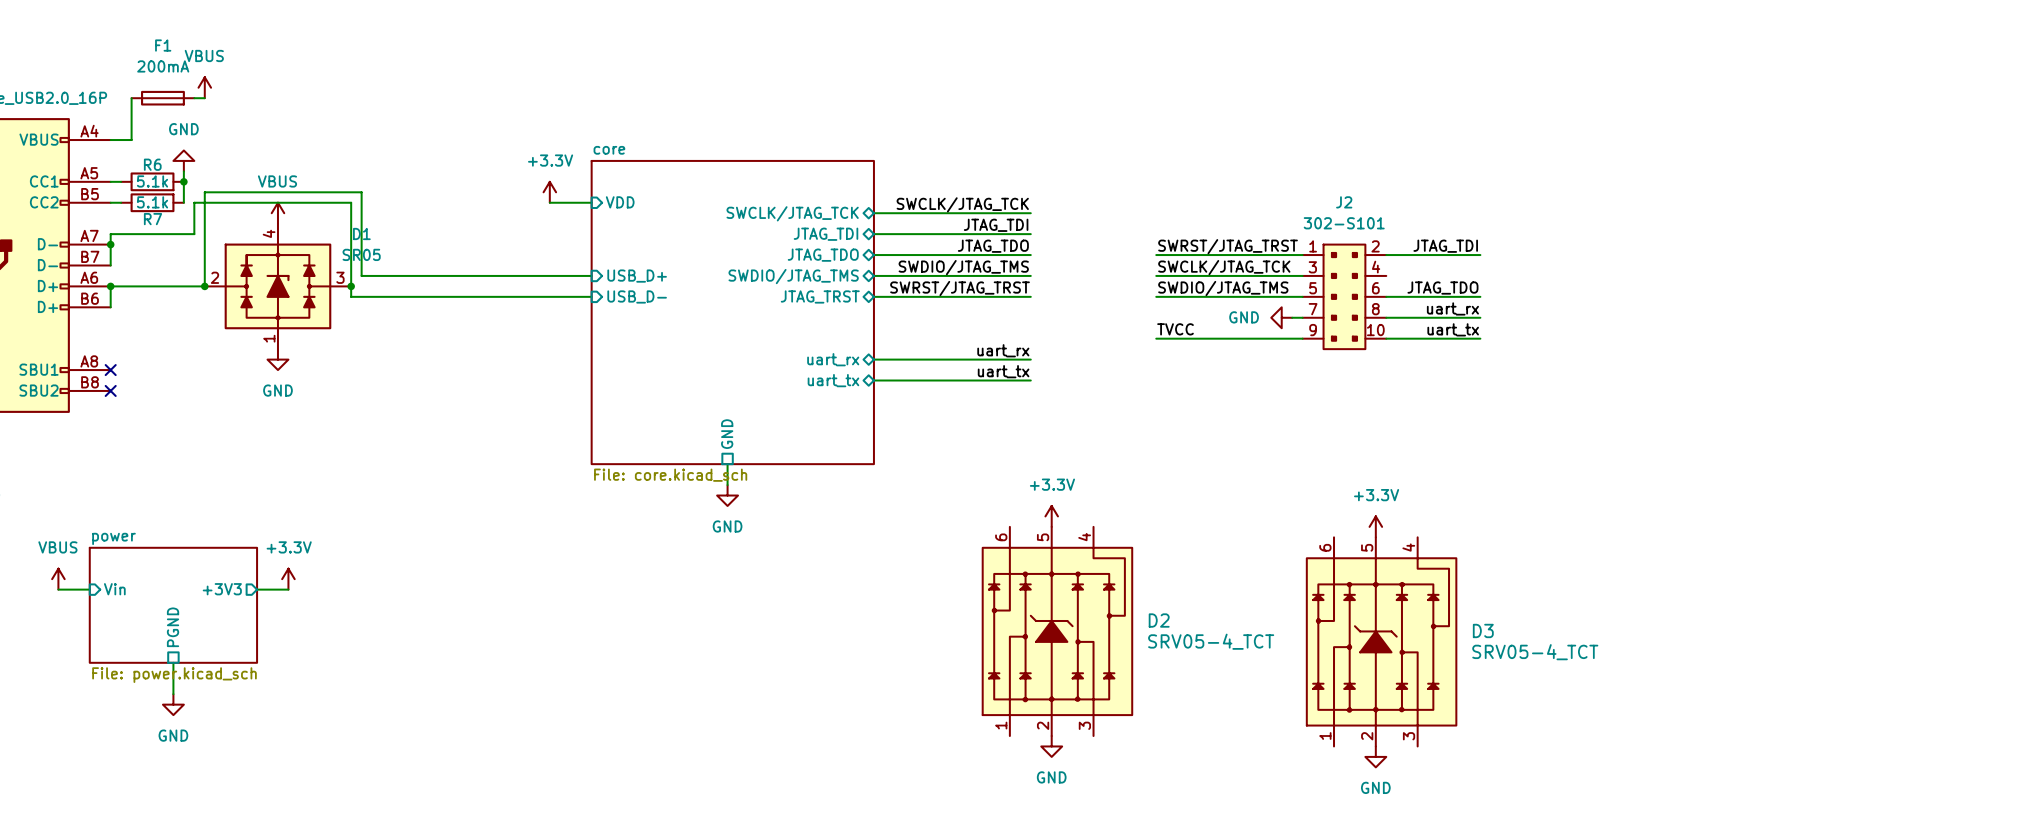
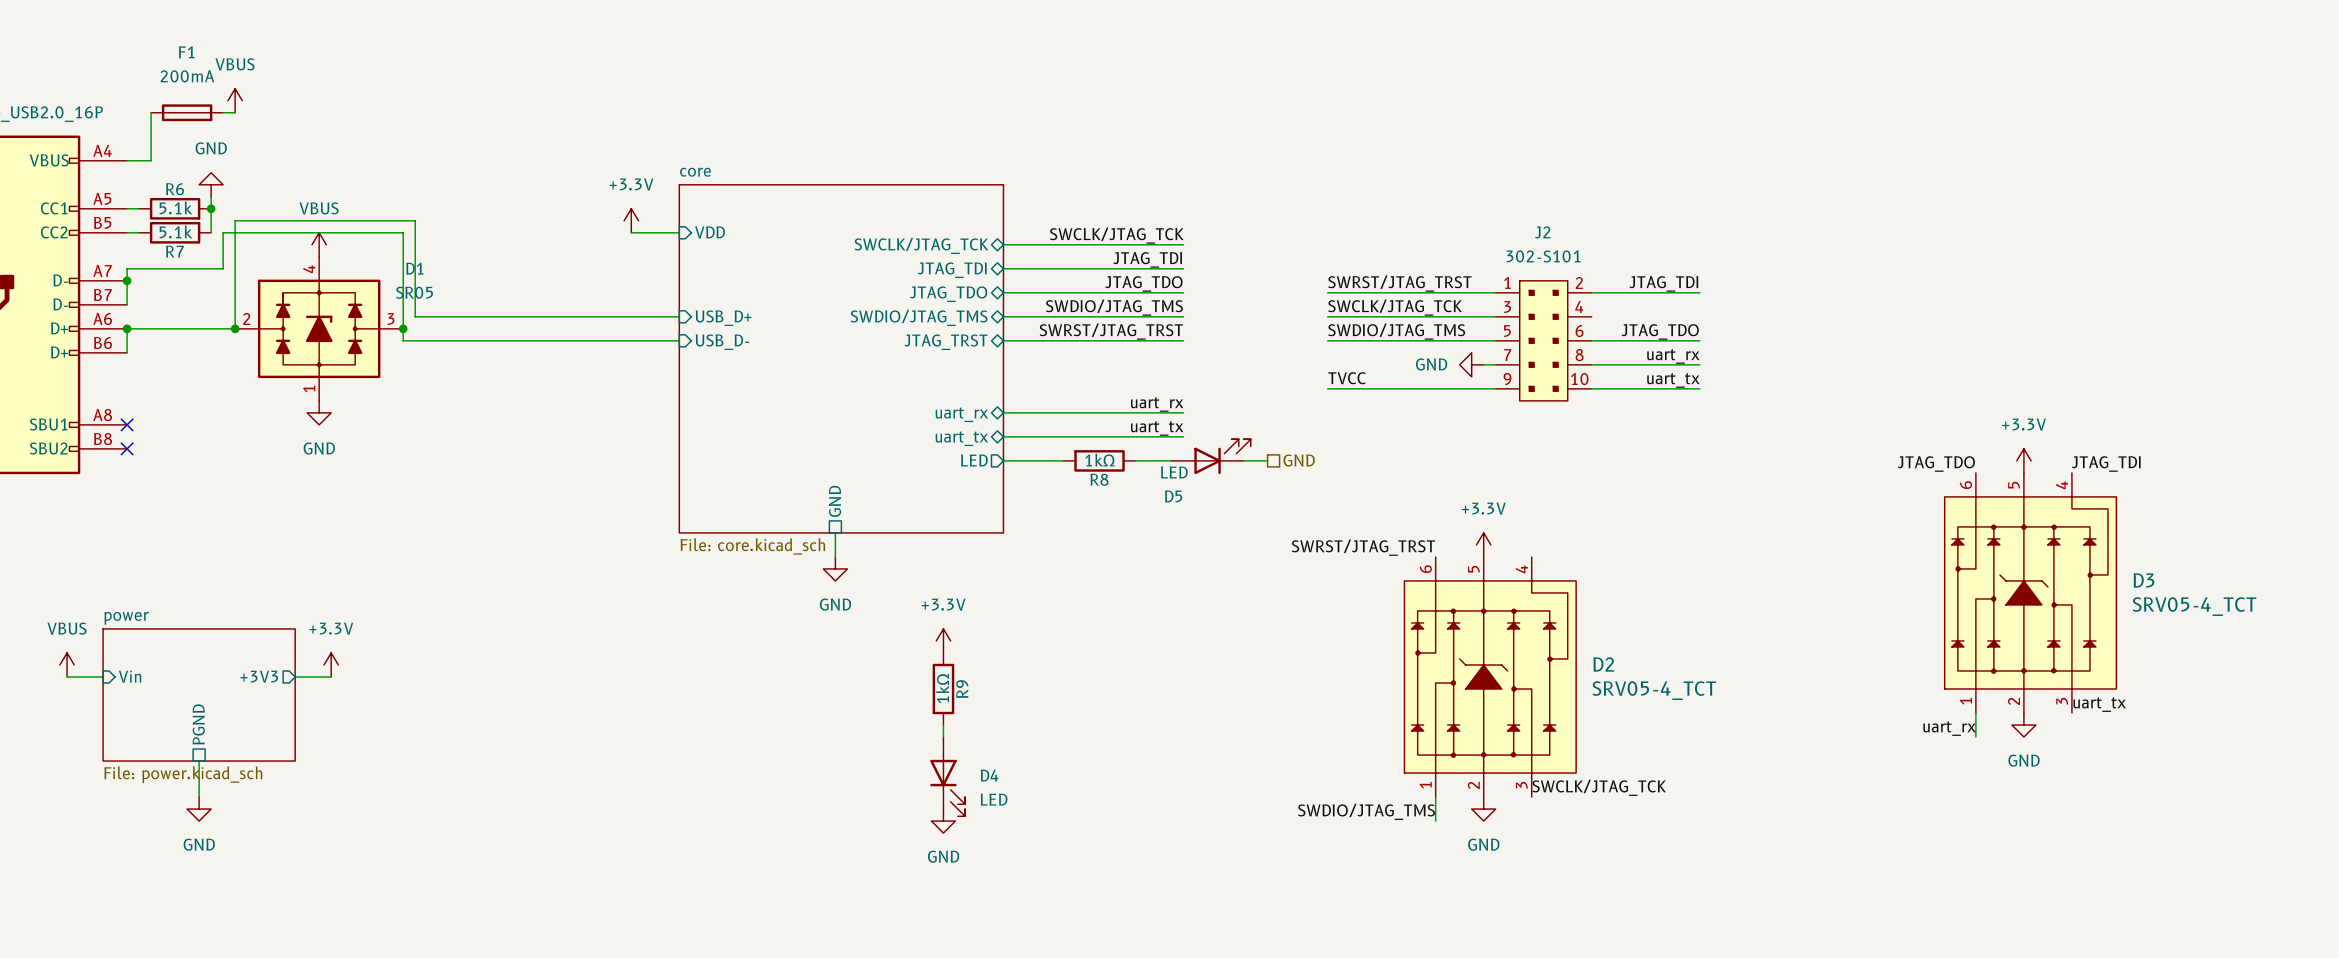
D5: none -> LED (1211, 456)
sheet pin: none -> LED (974, 460)
wire: none -> (1003, 460) (1063, 460)
R8: none -> 1kΩ (1099, 460)
wire: none -> (1135, 460) (1171, 460)
wire: none -> (1243, 460) (1267, 460)
hierarchical label: none -> GND (1299, 460)
power symbol: none -> +3.3V (2023, 460)
label: none -> JTAG_TDO (1936, 463)
label: none -> JTAG_TDI (2106, 463)
label: none -> SWRST/JTAG_TRST (1363, 547)
power symbol: +3.3V (1051, 516) -> none
power symbol position: +3.3V (1375, 526) -> +3.3V (1483, 544)
power symbol: none -> +3.3V (943, 640)
R9: none -> 1kΩ (943, 689)
label: none -> uart_tx (2099, 704)
wire: none -> (1975, 713) (1975, 737)
wire: none -> (943, 725) (943, 737)
D2 position: (1057, 631) -> (1490, 677)
power symbol: none -> GND (2023, 725)
label: none -> uart_rx (1949, 728)
D3 position: (1381, 641) -> (2030, 592)
D4: none -> LED (947, 776)
label: none -> SWCLK/JTAG_TCK (1599, 787)
wire: none -> (1435, 797) (1435, 821)
label: none -> SWDIO/JTAG_TMS (1366, 811)
power symbol: none -> GND (943, 821)
power symbol: GND (1051, 746) -> none
power symbol position: GND (1375, 756) -> GND (1483, 809)

